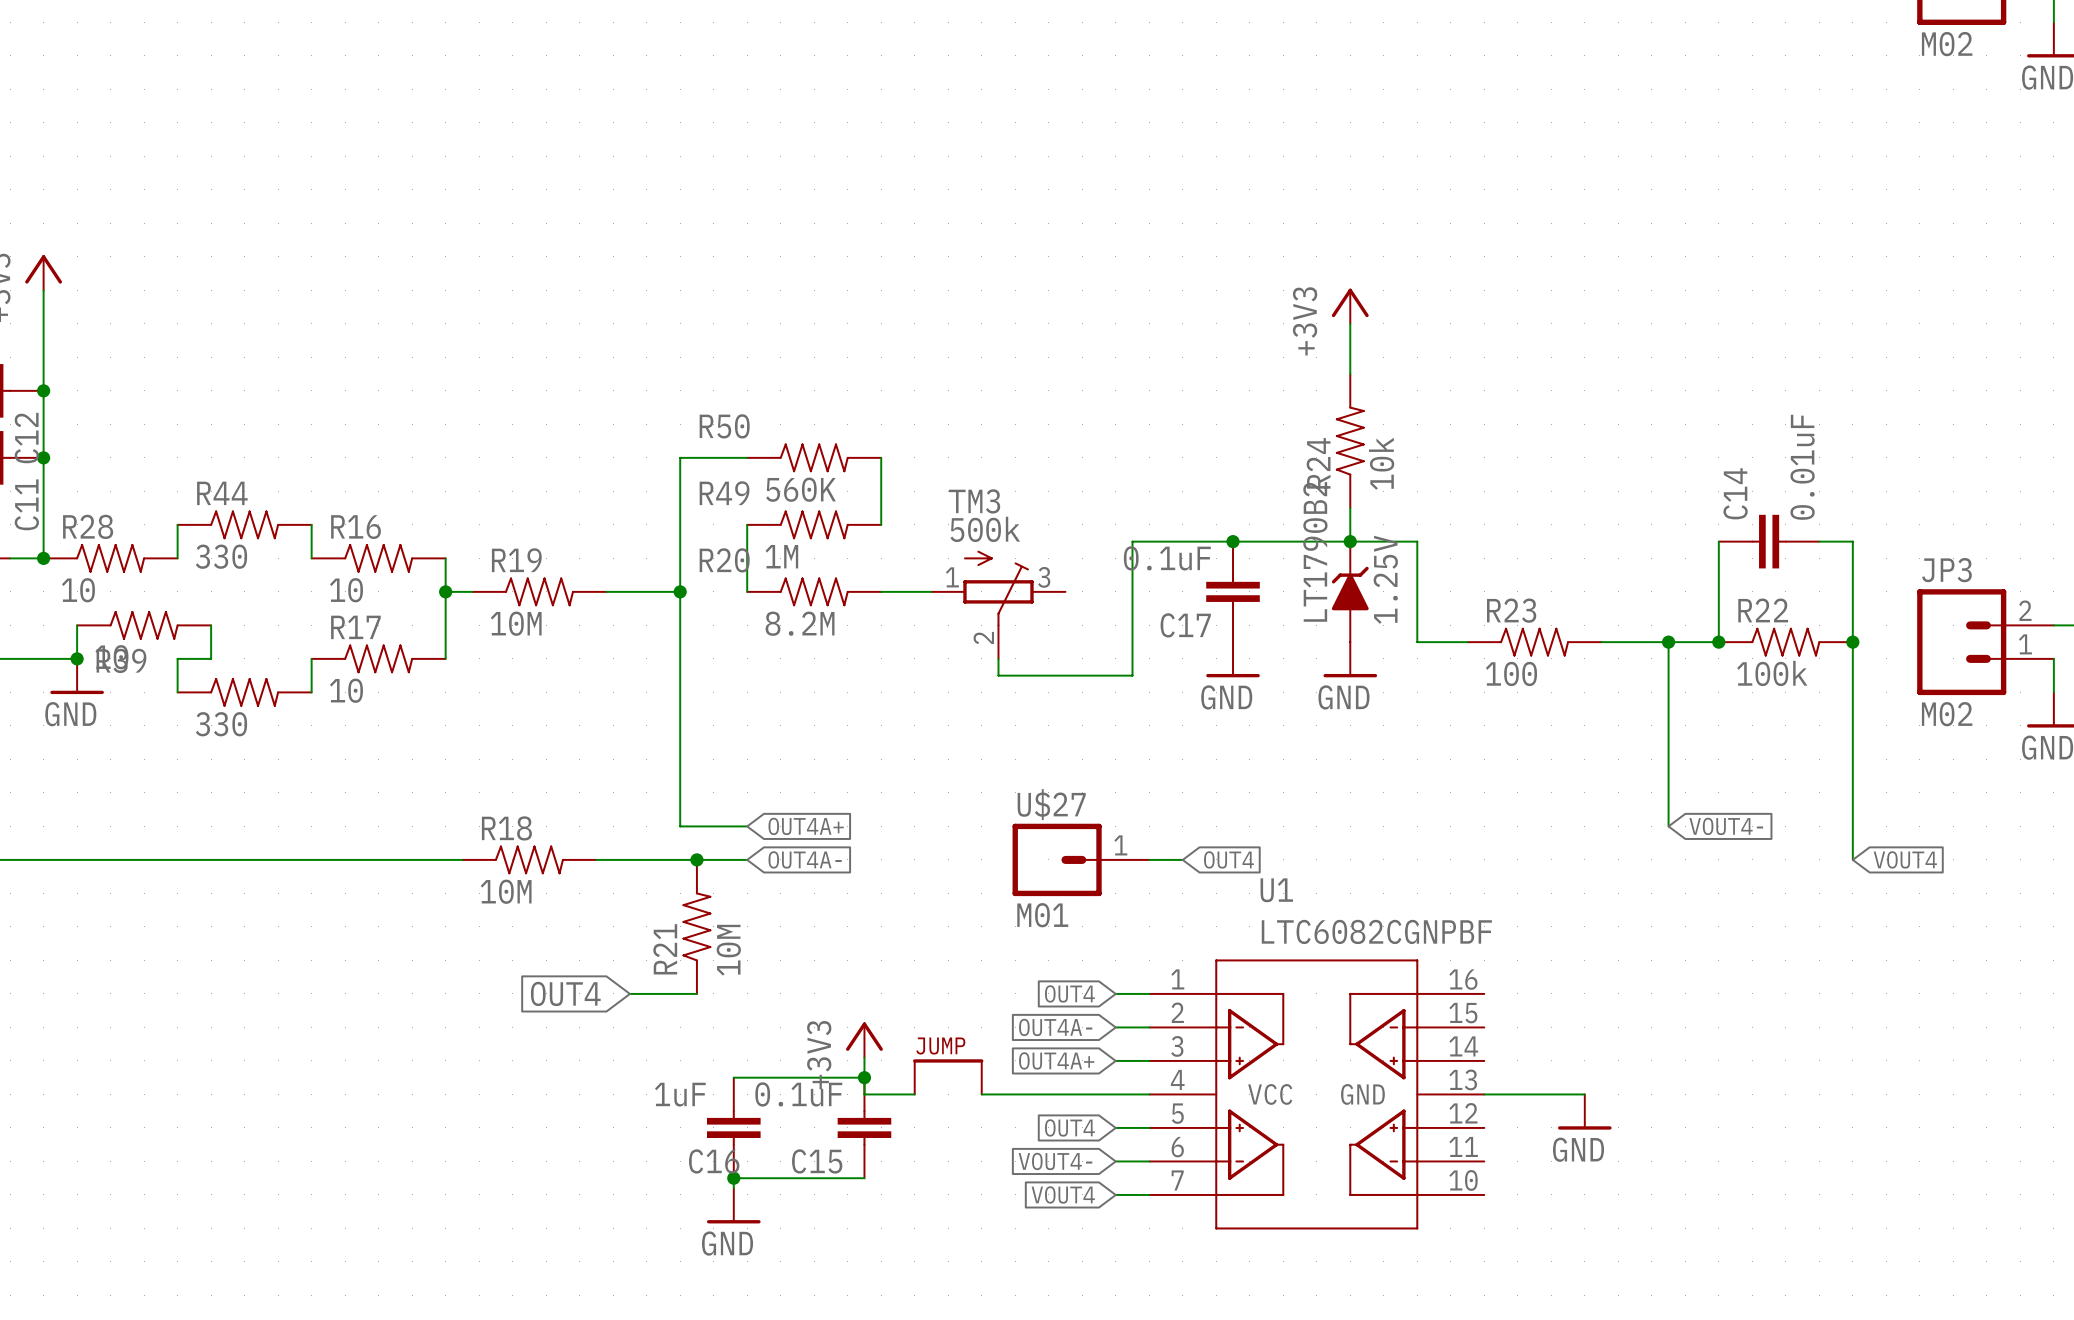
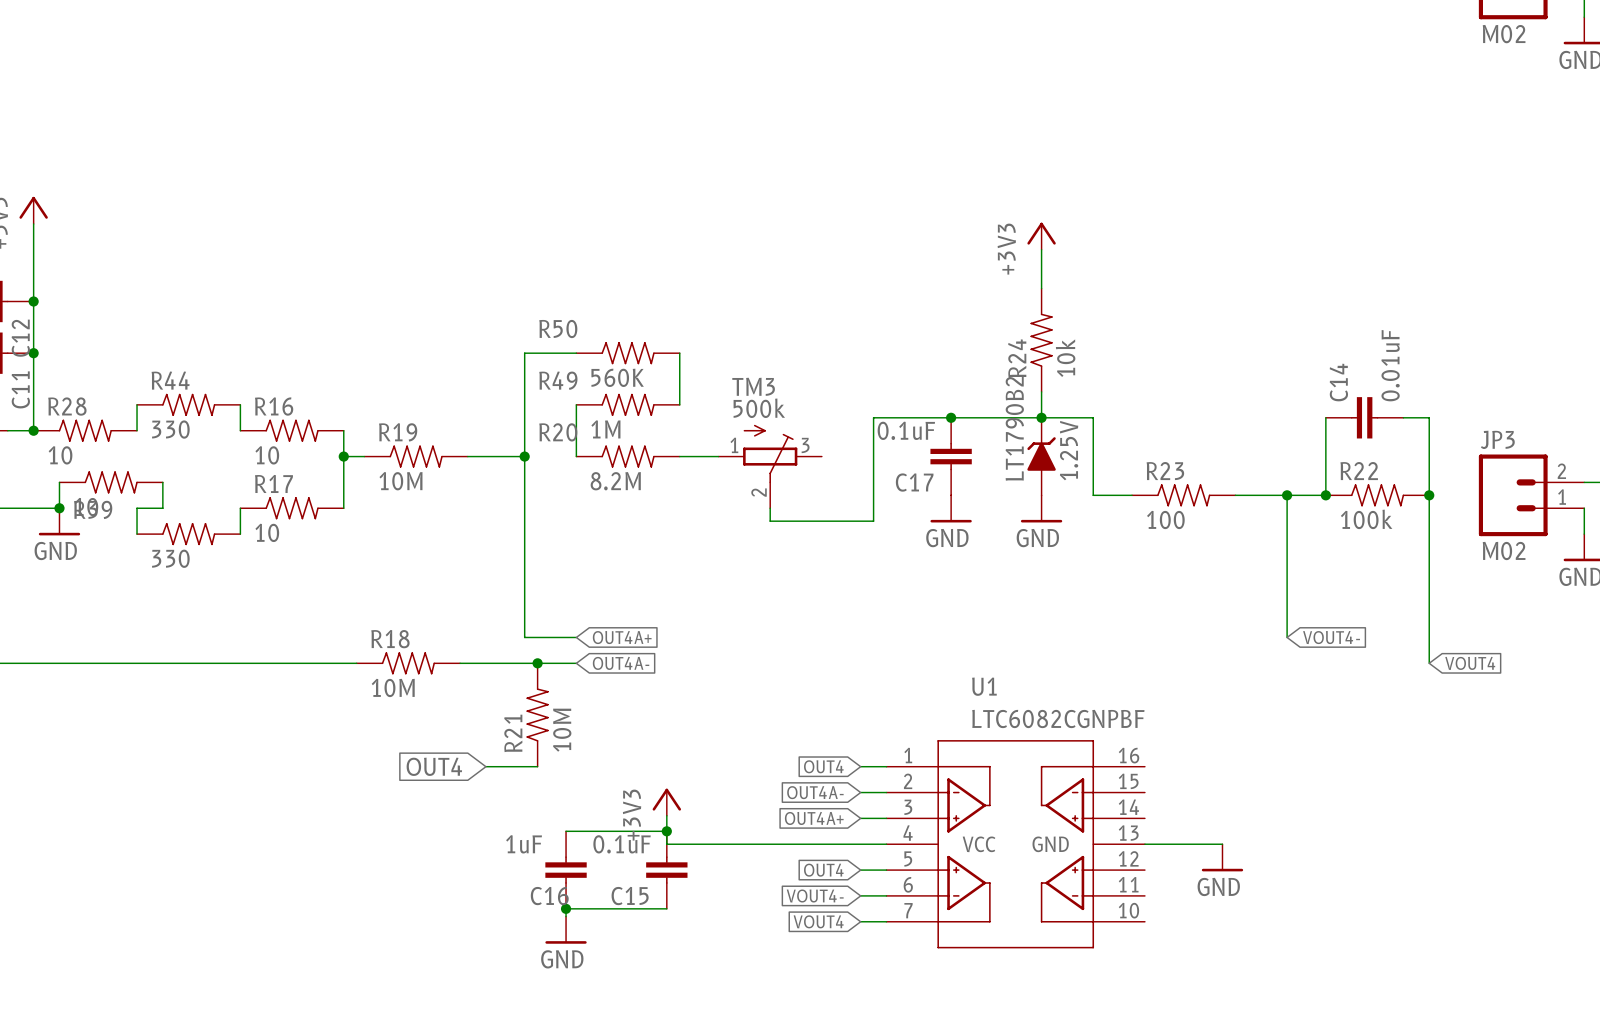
U$27: M01 (1080, 859) -> none
wire: (1149, 859) (1182, 859) -> none
global label: OUT4 (1228, 859) -> none
part: (948, 1076) -> none
wire: none -> (705, 844) (757, 844)

